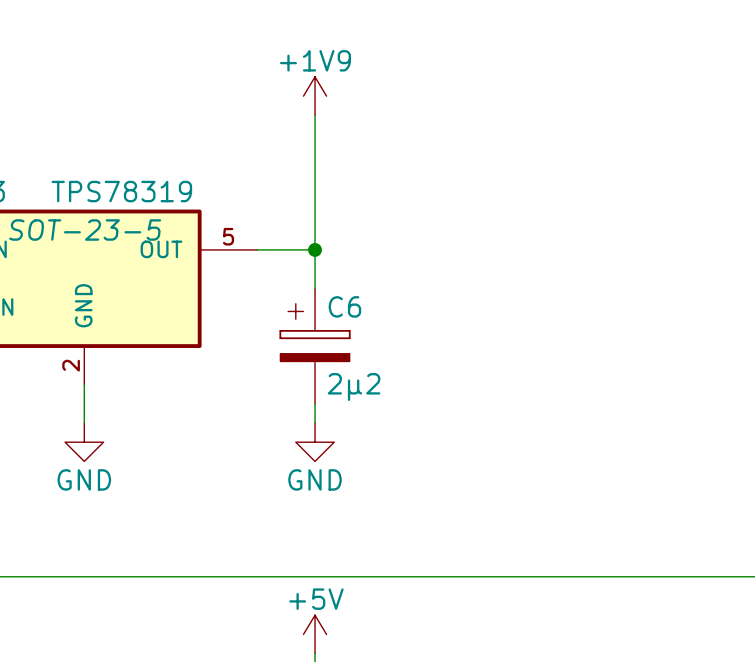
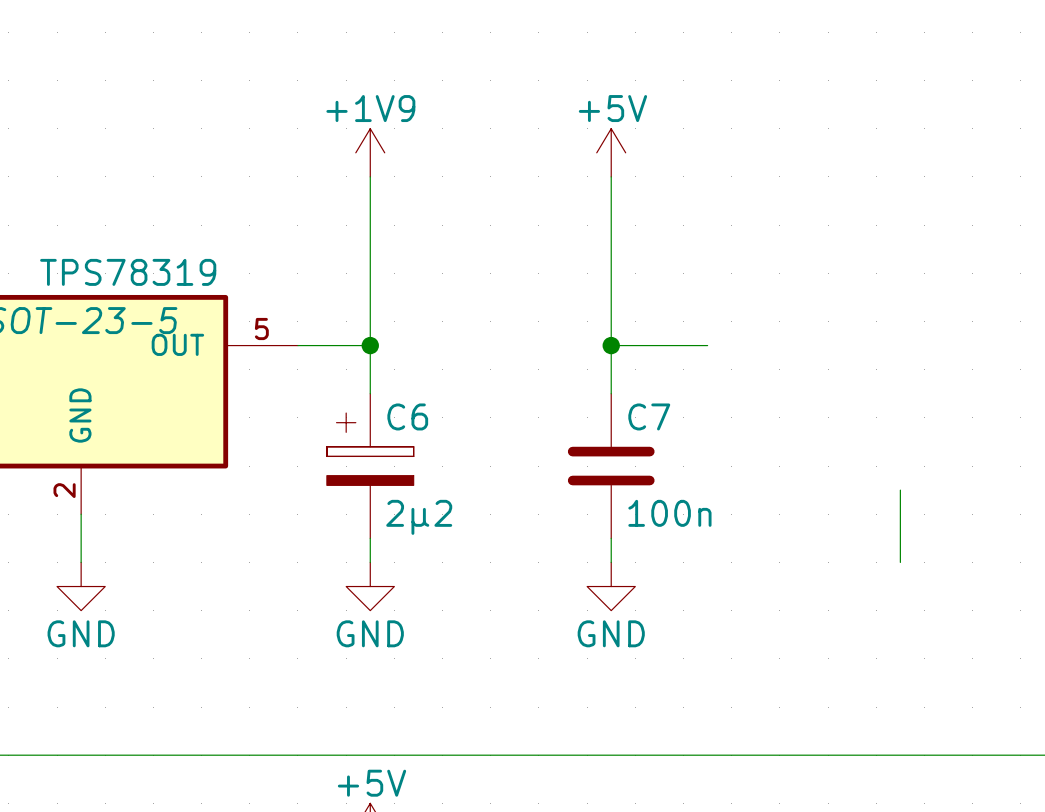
power symbol: none -> +5V (611, 152)
wire: none -> (611, 176) (611, 393)
wire: none -> (611, 345) (707, 345)
junction: none -> (611, 345)
C7: none -> 100n (611, 466)
wire: none -> (900, 490) (900, 562)
wire: none -> (611, 538) (611, 562)
power symbol: none -> GND (611, 586)

